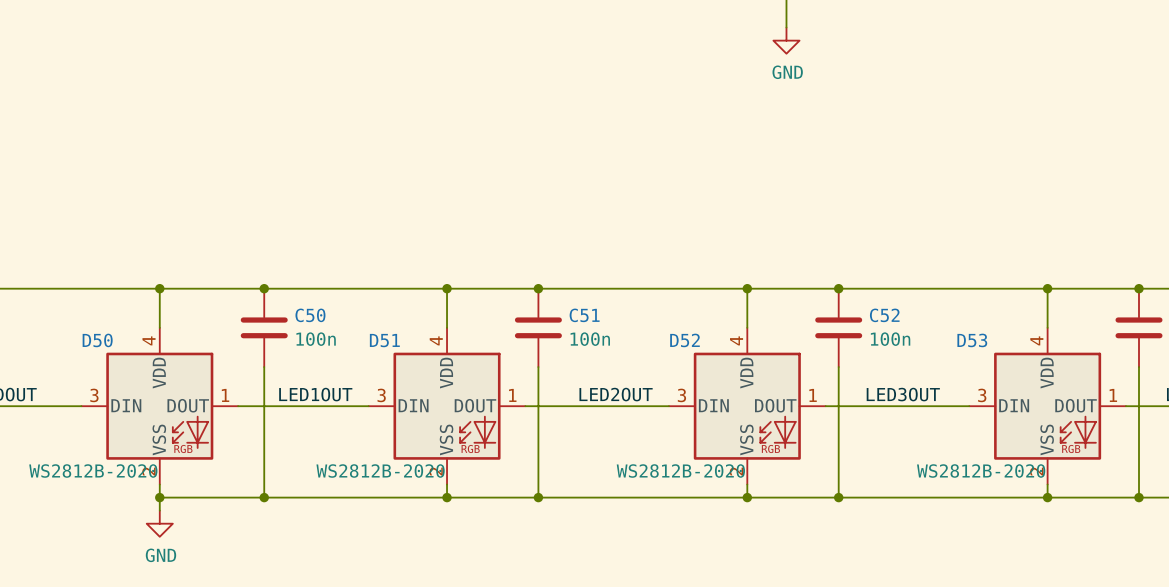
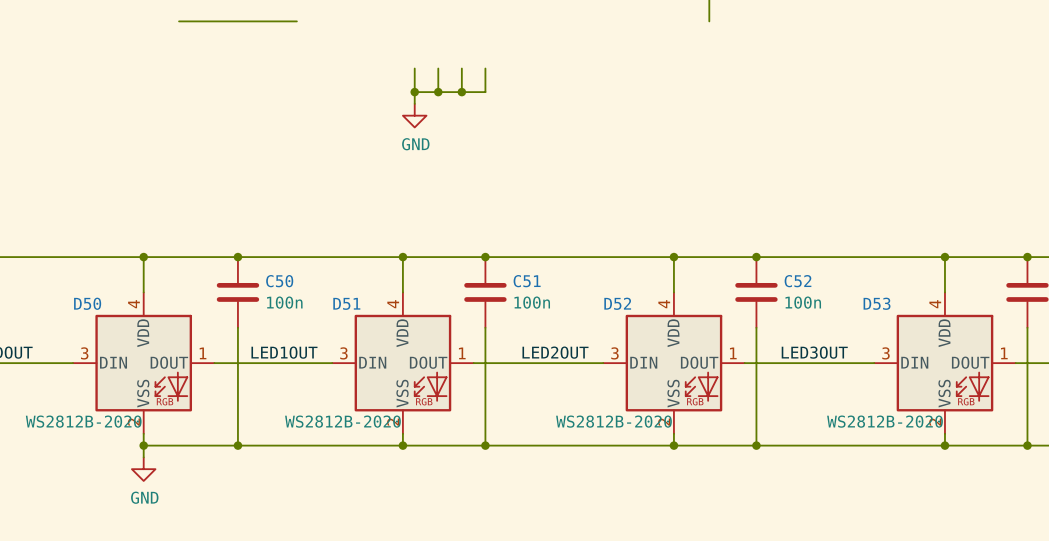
wire: none -> (179, 21) (296, 21)
power symbol: GND (786, 40) -> none
wire: none -> (414, 68) (414, 103)
wire: none -> (438, 68) (438, 92)
wire: none -> (461, 68) (461, 92)
wire: none -> (485, 68) (485, 92) (414, 92)
junction: none -> (414, 92)
junction: none -> (438, 92)
junction: none -> (461, 92)
power symbol: none -> GND (414, 115)

